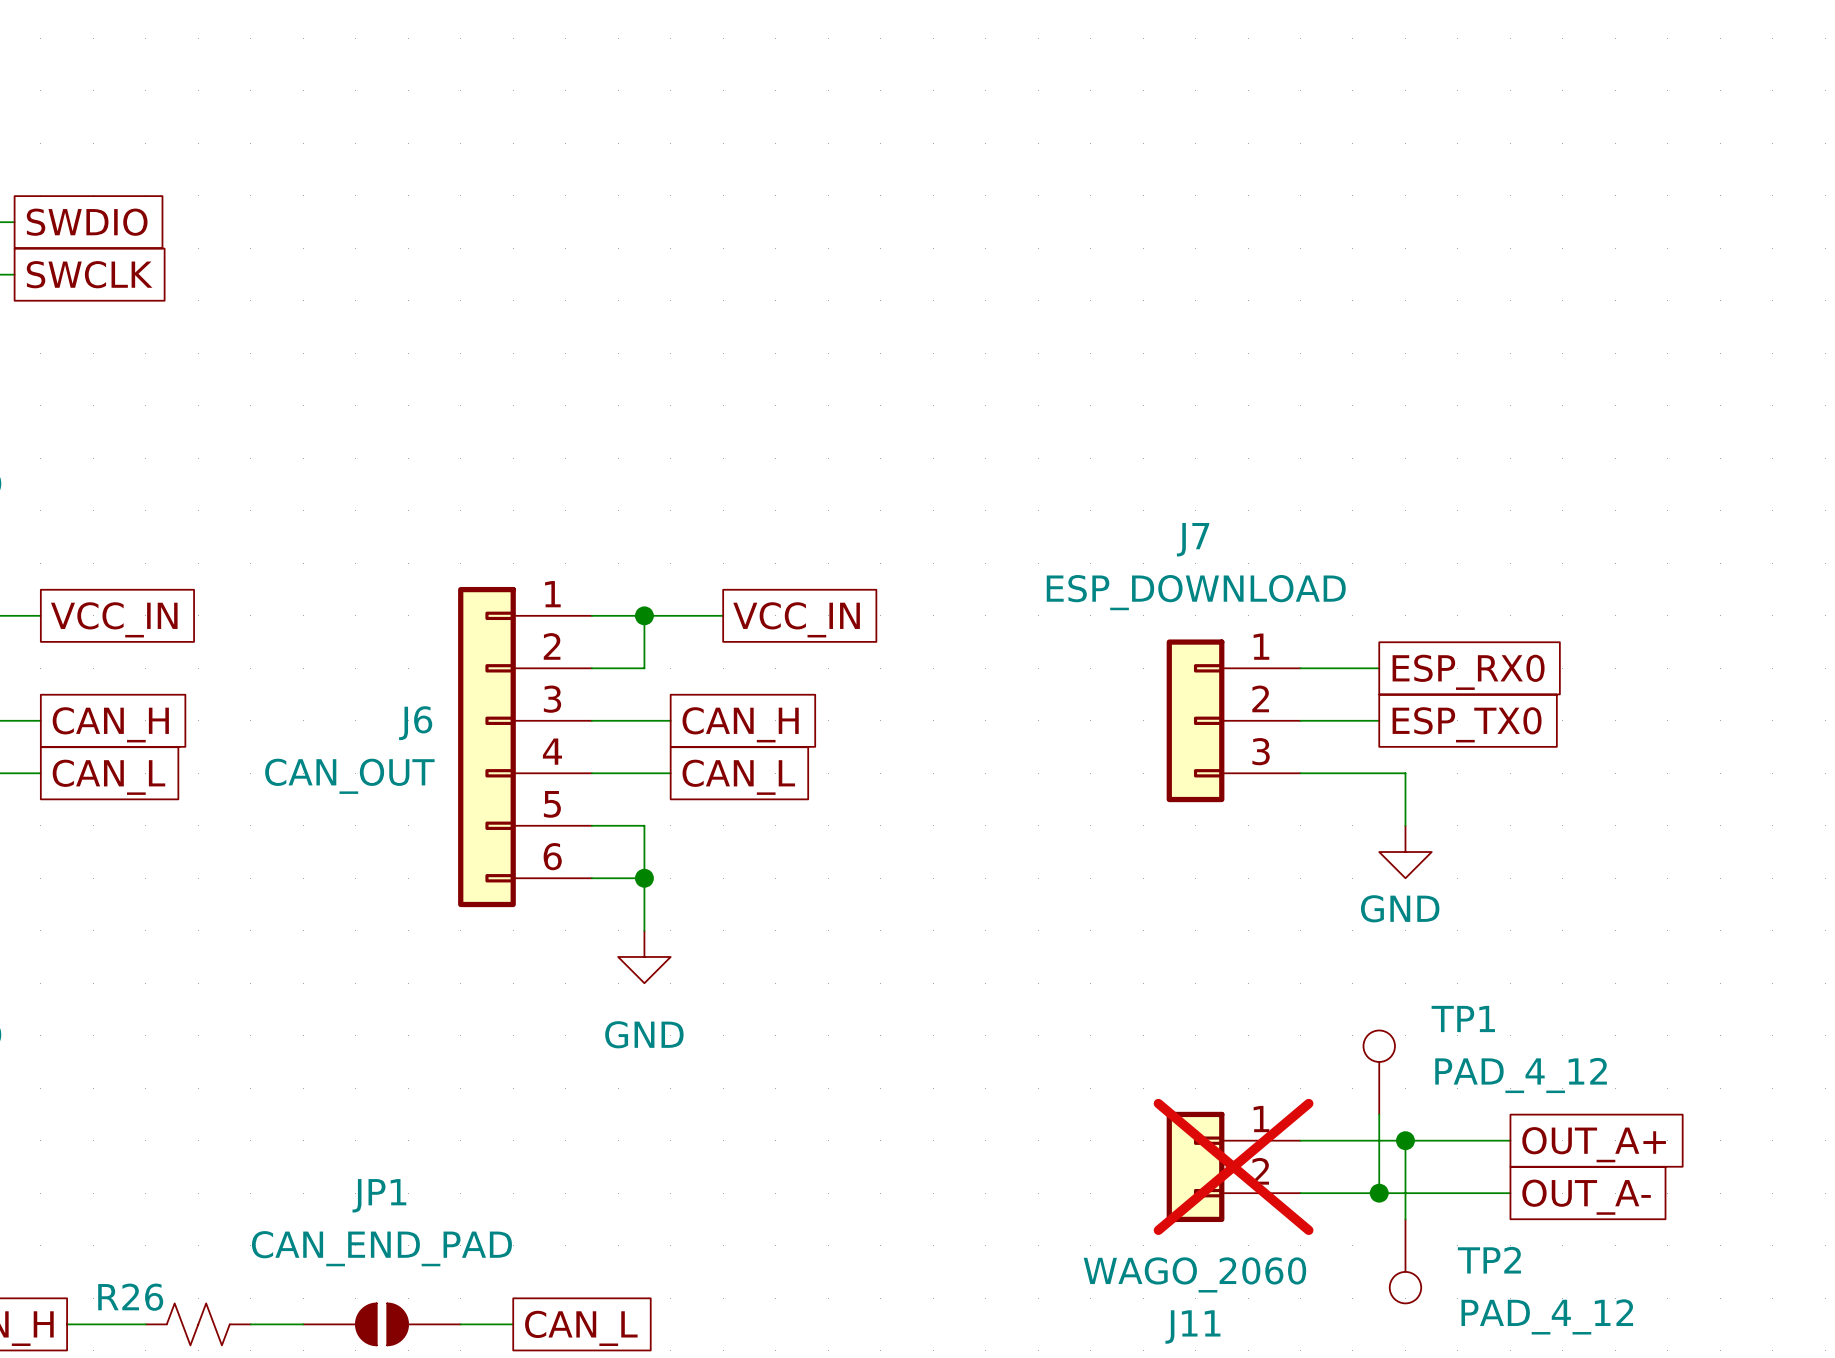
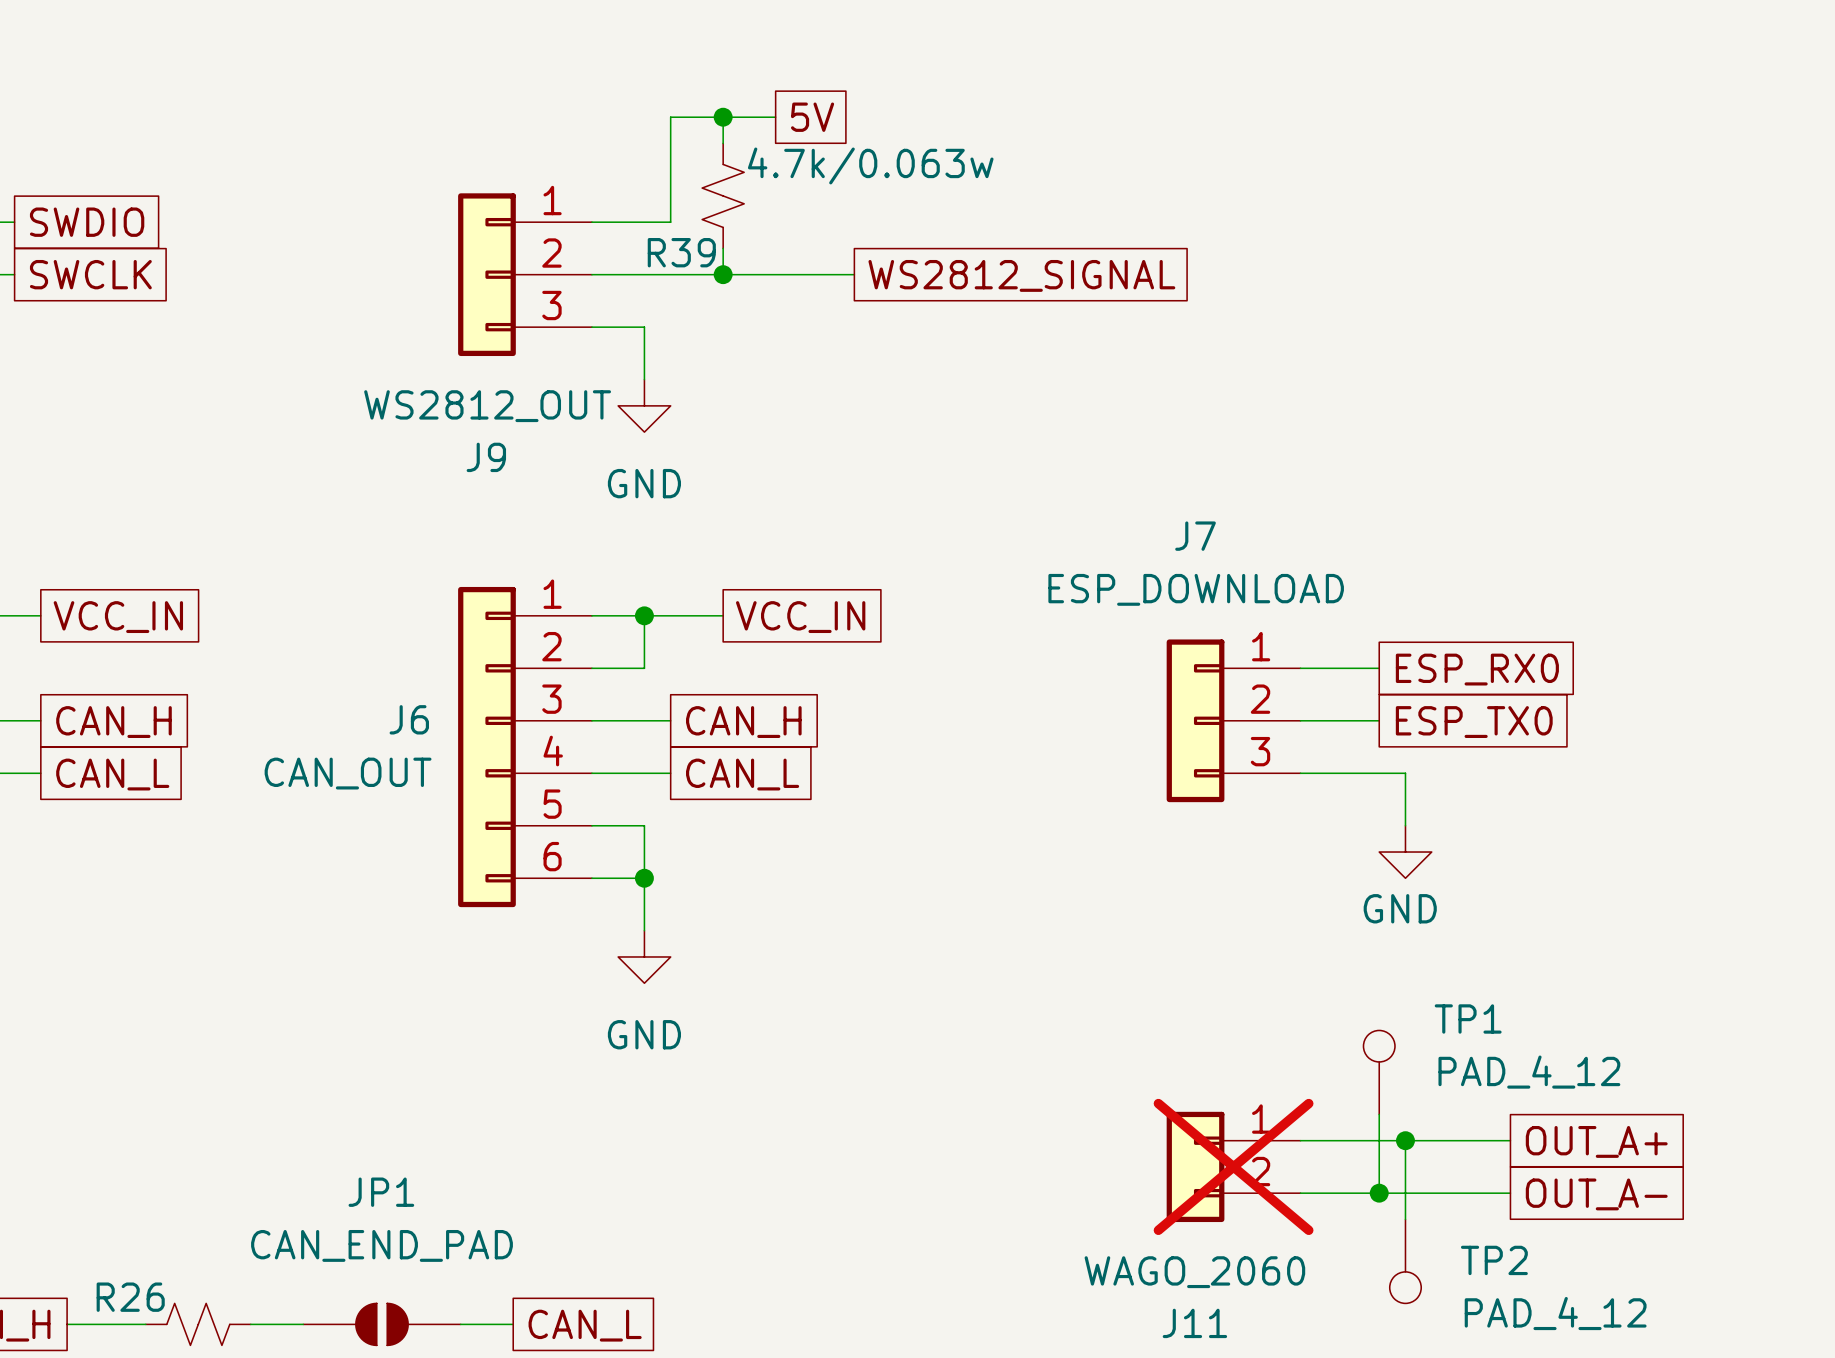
wire: none -> (723, 117) (723, 143)
junction: none -> (723, 117)
wire: none -> (775, 117) (670, 117) (670, 222) (591, 222)
global label: none -> 5V (812, 117)
R39: none -> 4.7k/0.063w (723, 195)
wire: none -> (723, 248) (723, 274)
J9: none -> WS2812_OUT (525, 274)
wire: none -> (591, 274) (854, 274)
junction: none -> (723, 274)
global label: none -> WS2812_SIGNAL (1021, 275)
wire: none -> (591, 327) (644, 327) (644, 379)
power symbol: none -> GND (644, 405)

